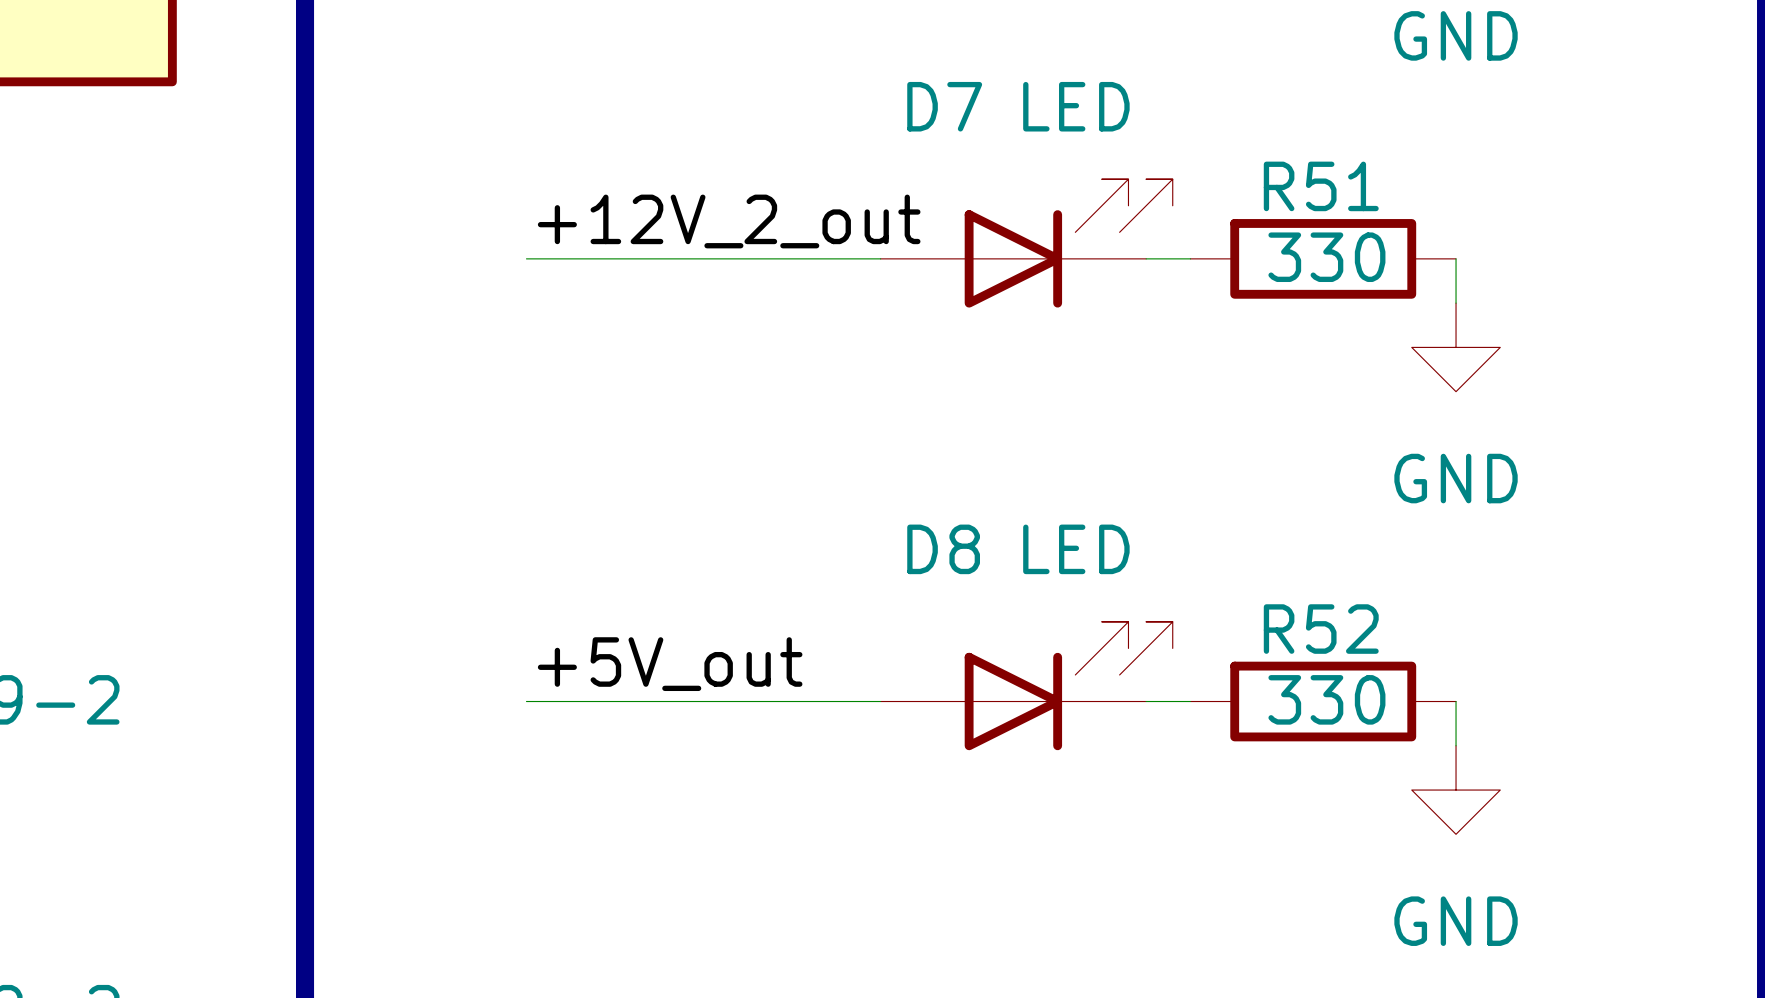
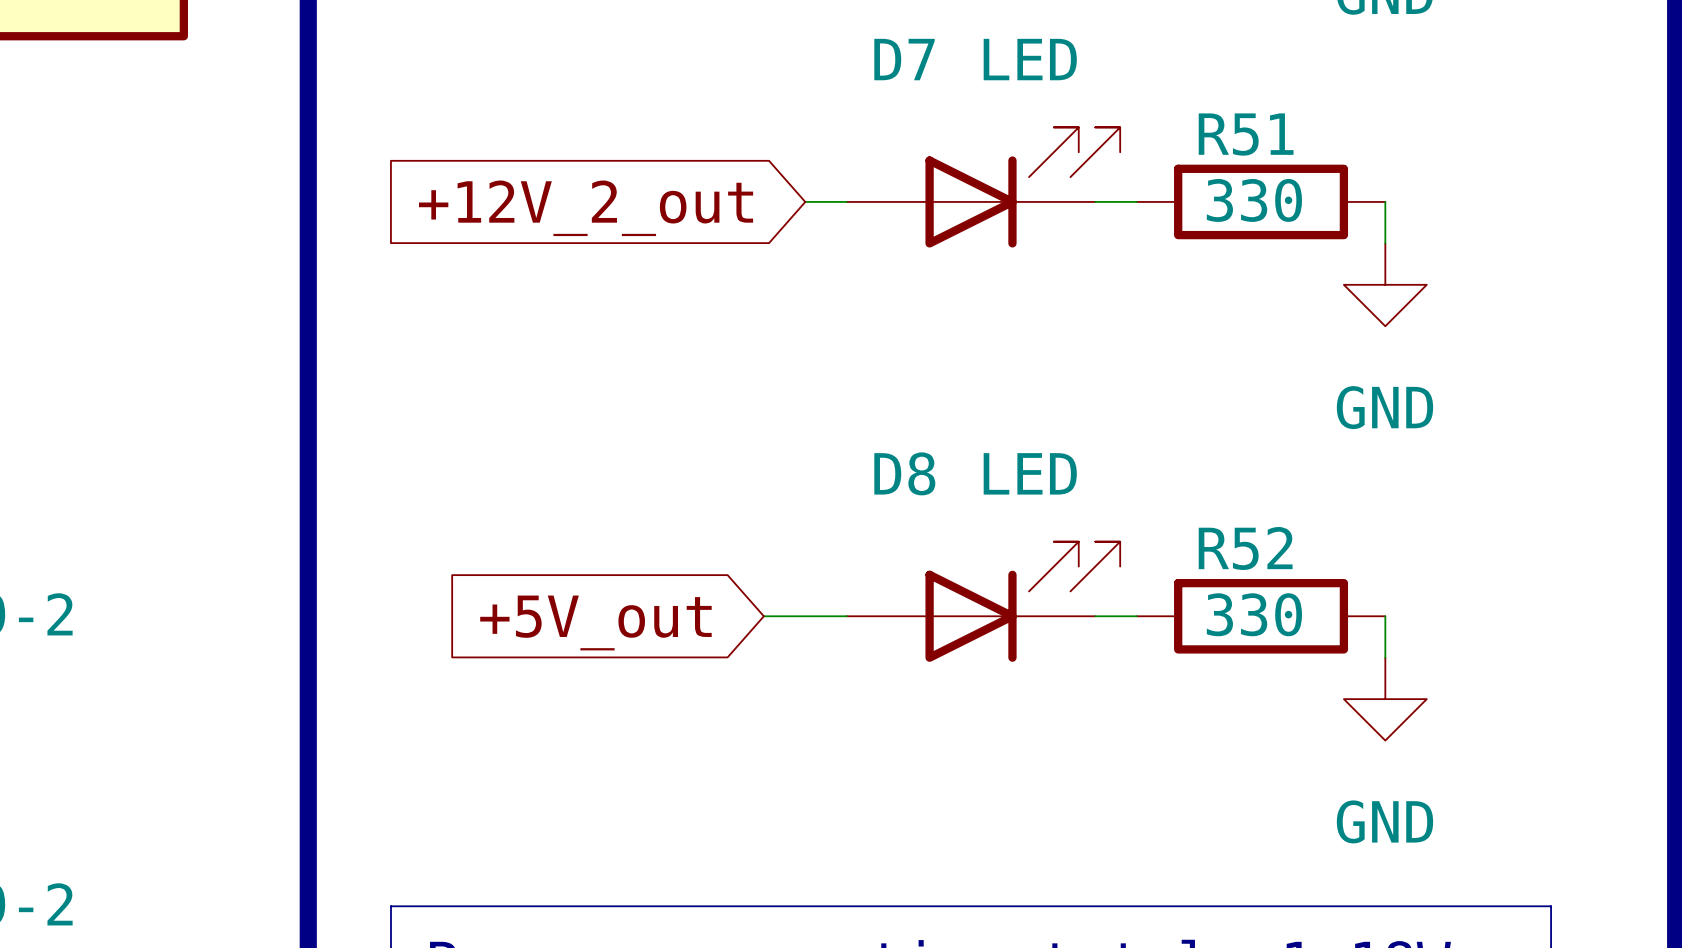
label: +12V_2_out (729, 221) -> none
wire: (526, 258) (836, 258) -> none
global label: none -> +12V_2_out (586, 208)
label: +5V_out (670, 664) -> none
wire: (526, 701) (792, 701) -> none
global label: none -> +5V_out (595, 622)

